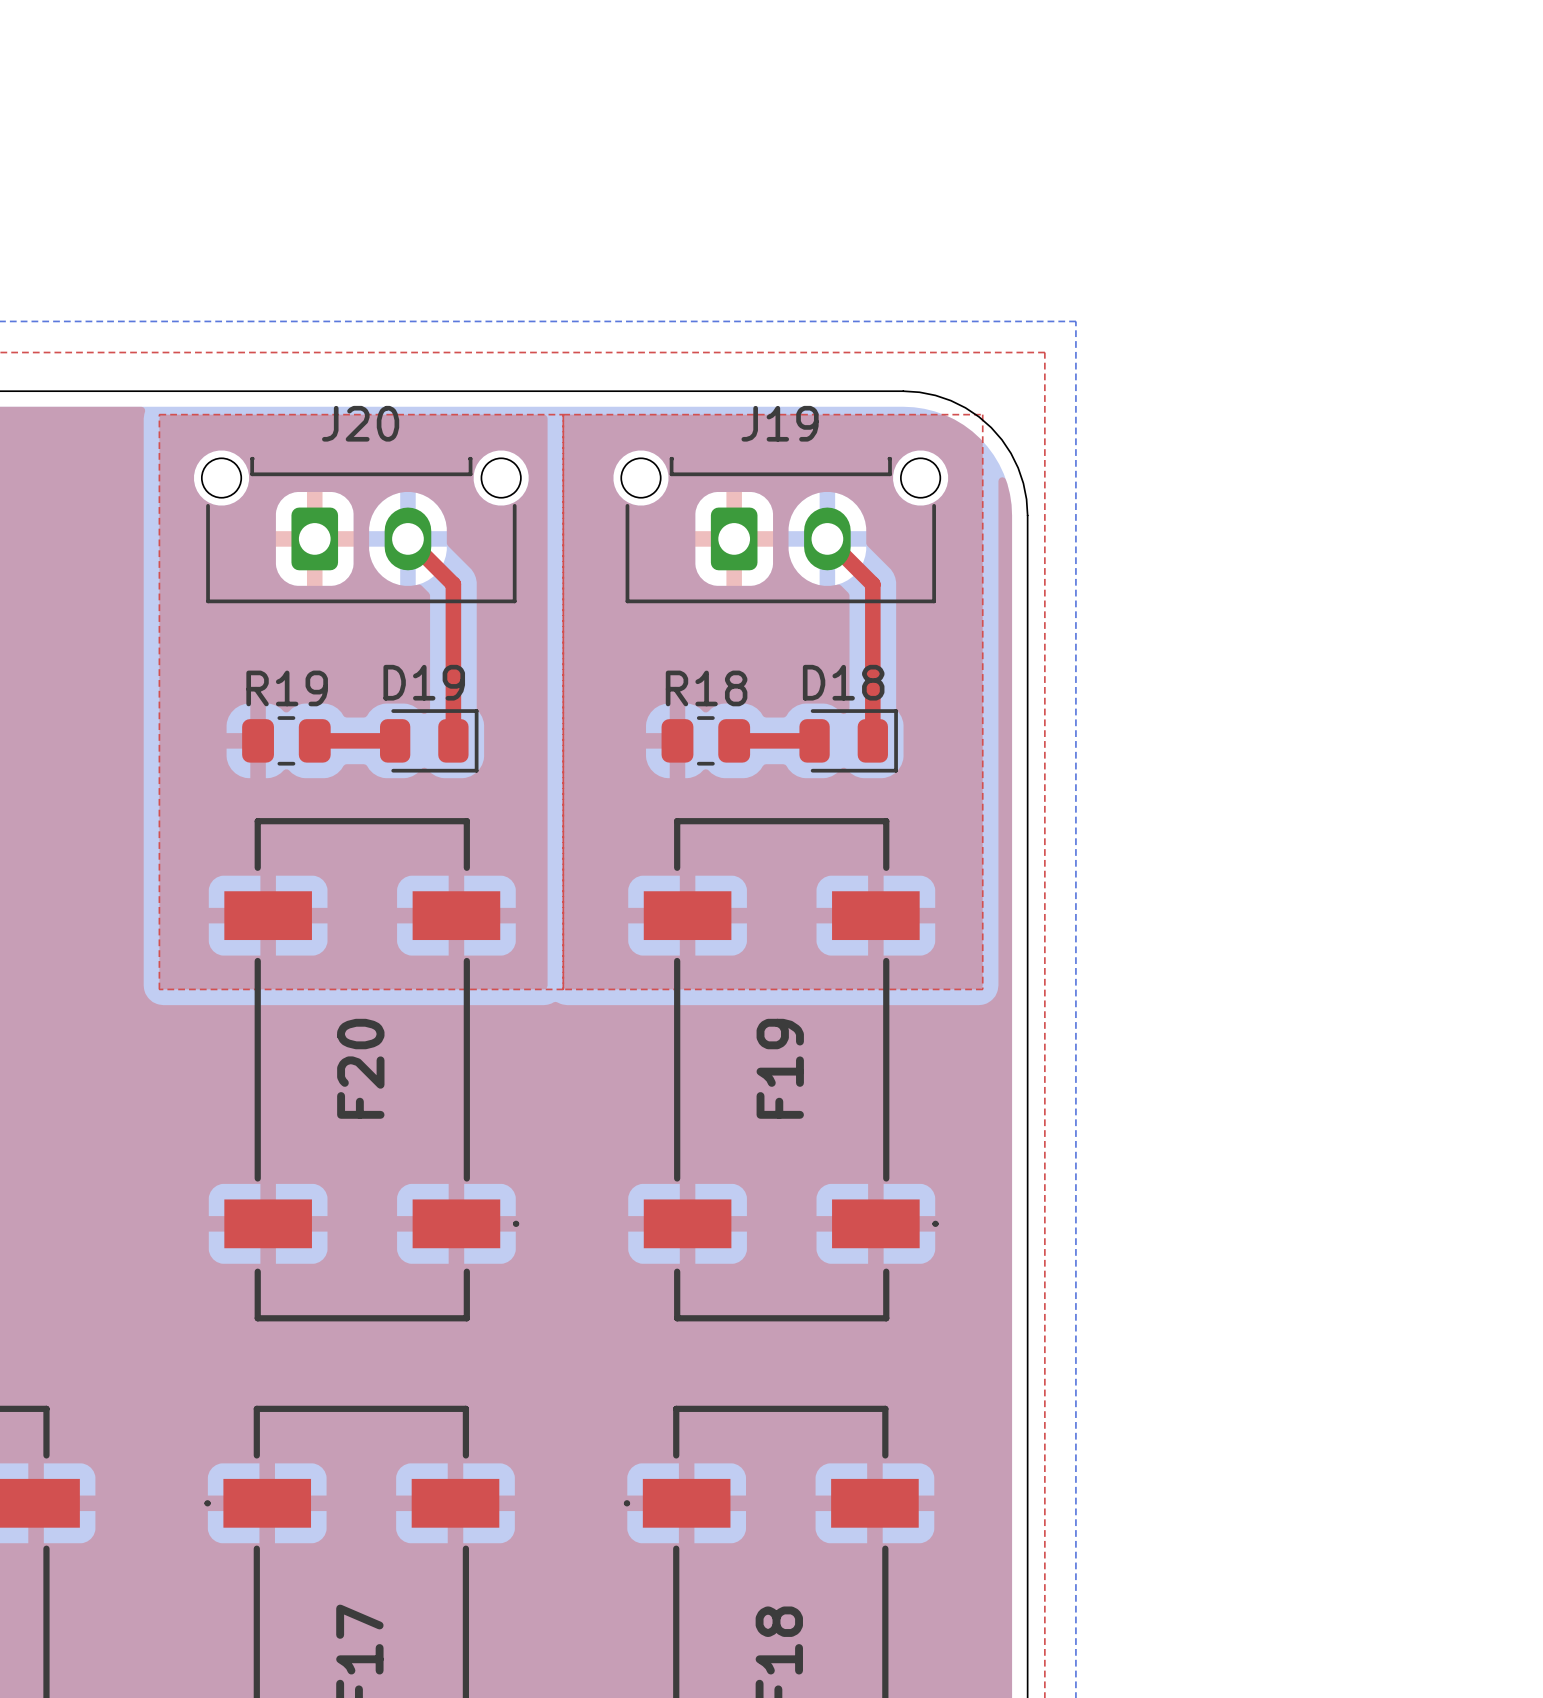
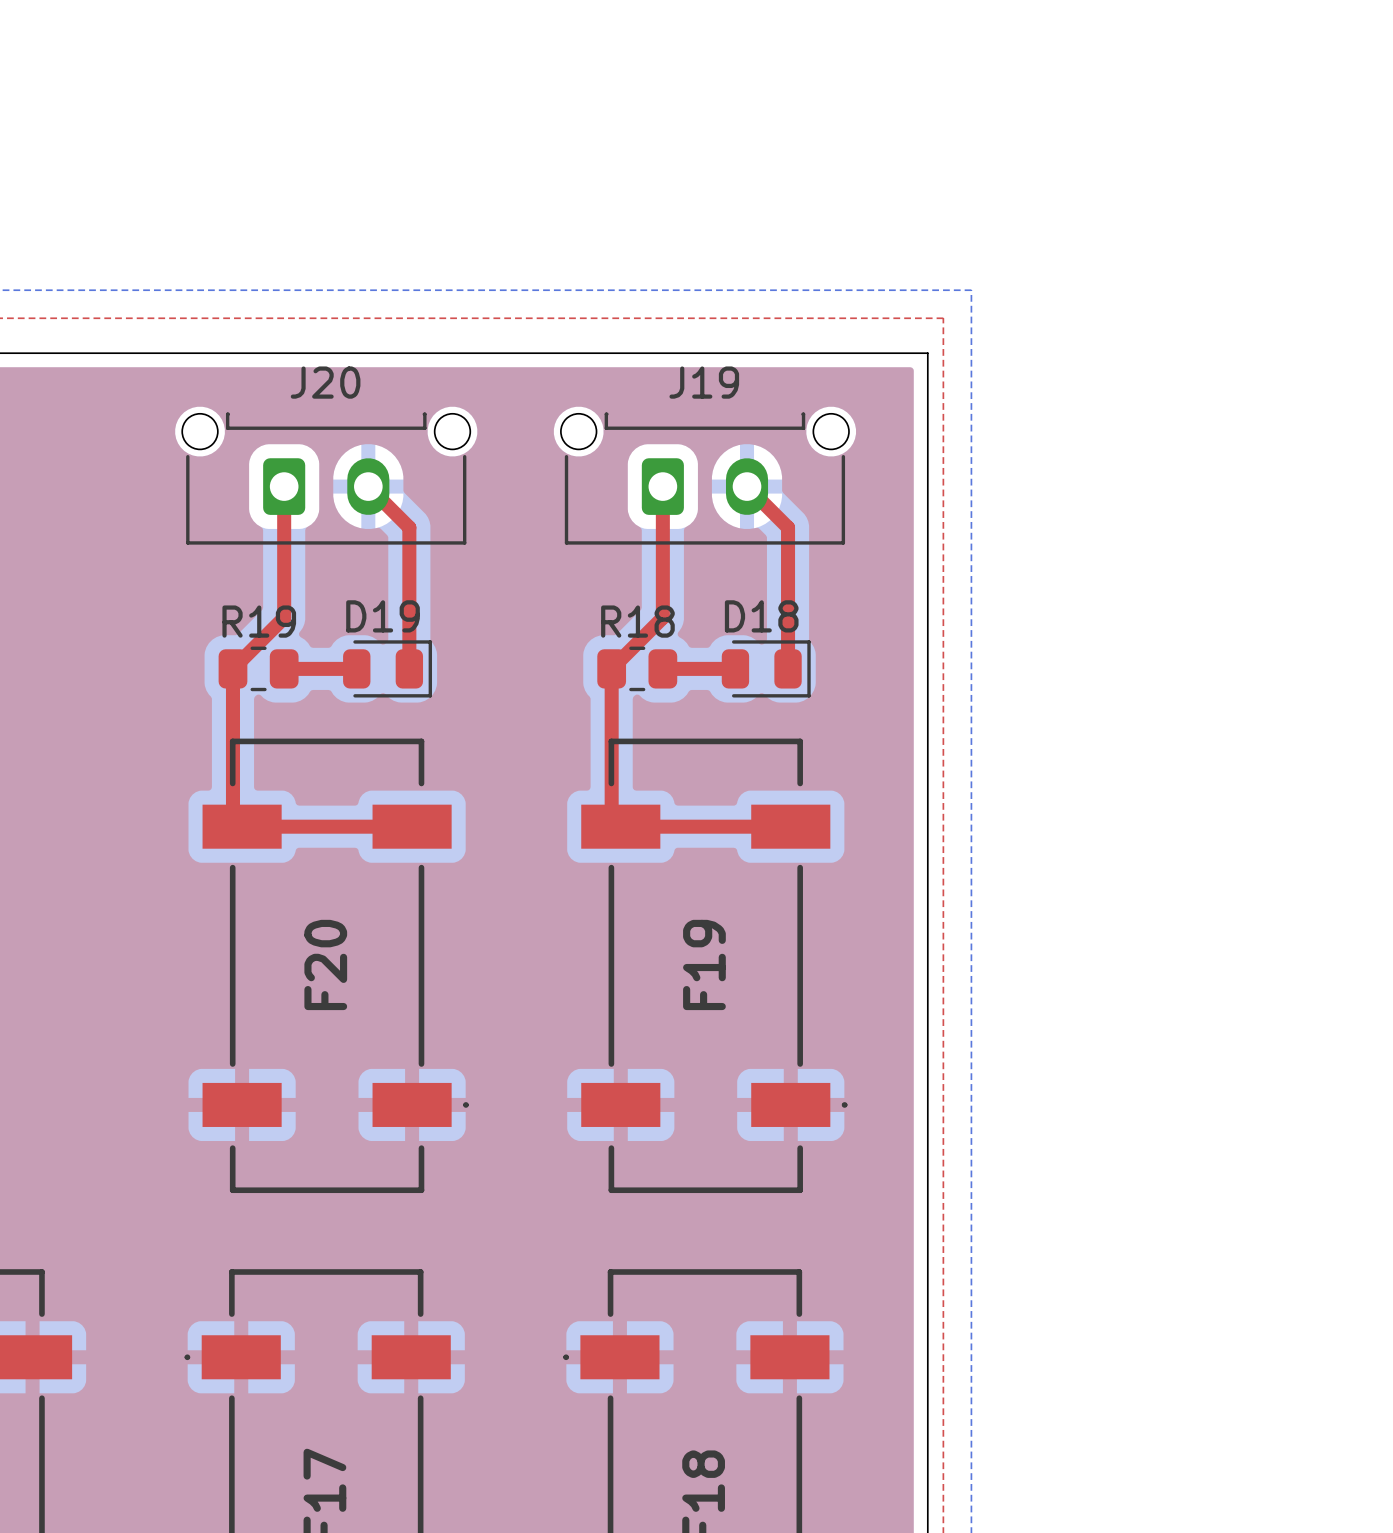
board edge: (903, 391) (919, 392) (950, 400) (965, 407) (991, 427) (1010, 453) (1018, 467) (1026, 499) (1027, 515) -> (815, 353) (927, 353) (927, 465)
top zone outline: (159, 414) (982, 414) (982, 989) (159, 989) (159, 414) -> none
top zone outline: (563, 414) (563, 989) -> none
top track: none -> (284, 486) (284, 617) (232, 668) (232, 817)
top track: none -> (662, 486) (662, 617) (611, 668) (611, 817)
top track: none -> (242, 826) (412, 826)
top track: none -> (620, 826) (790, 826)

